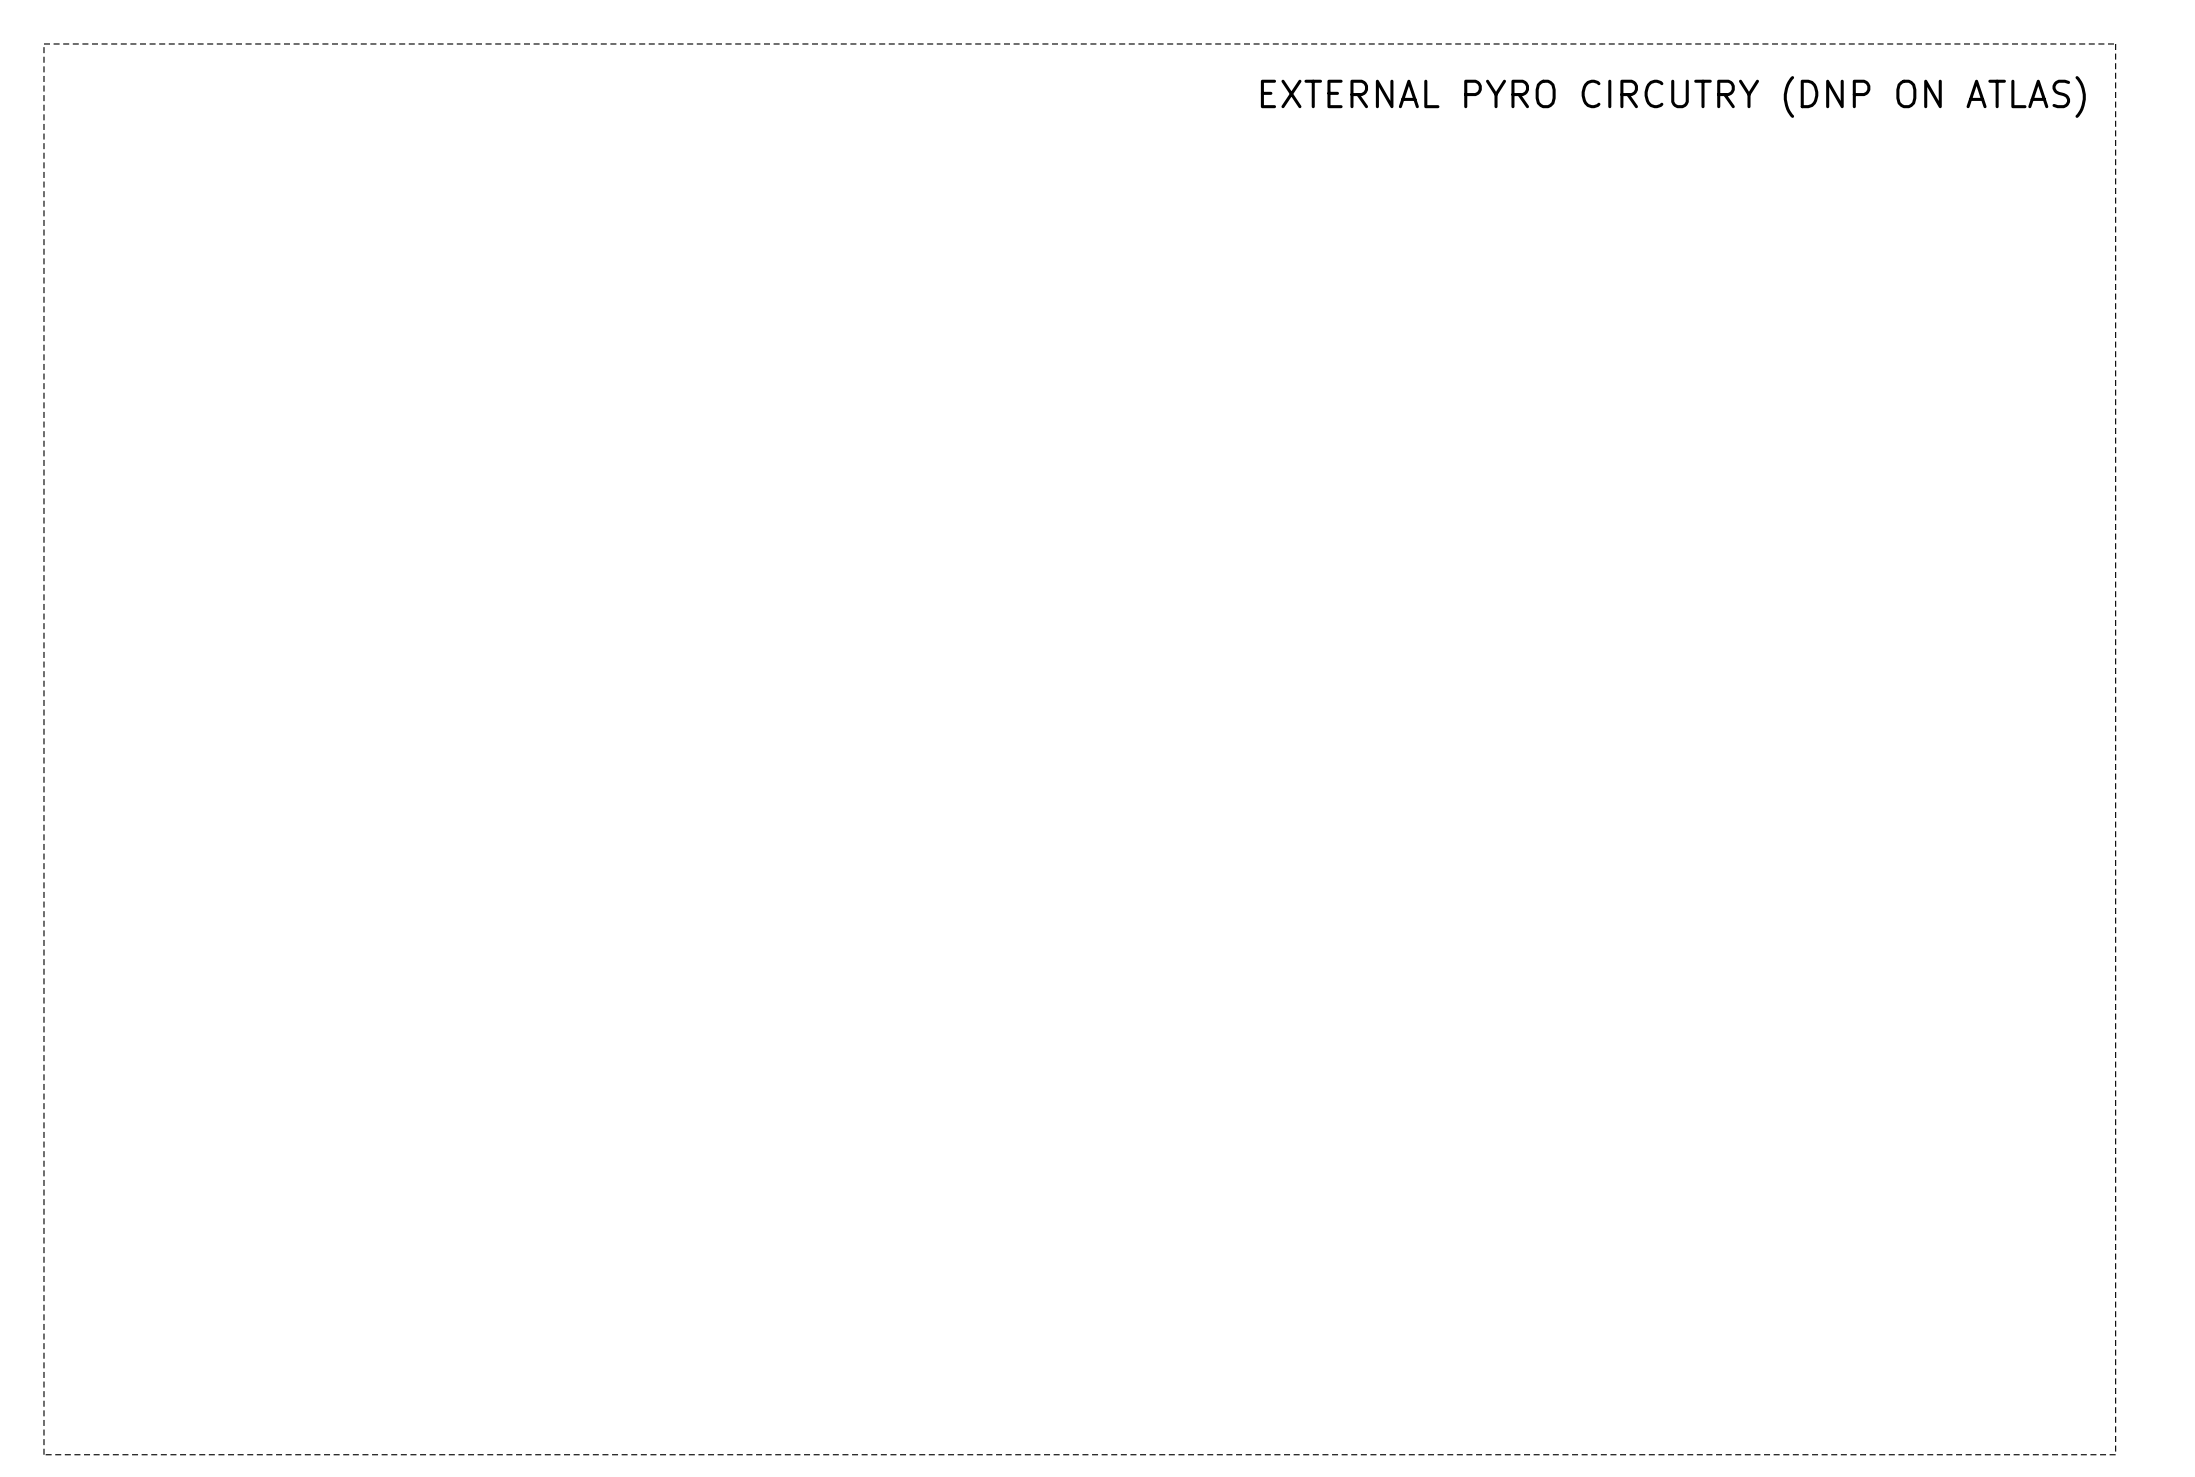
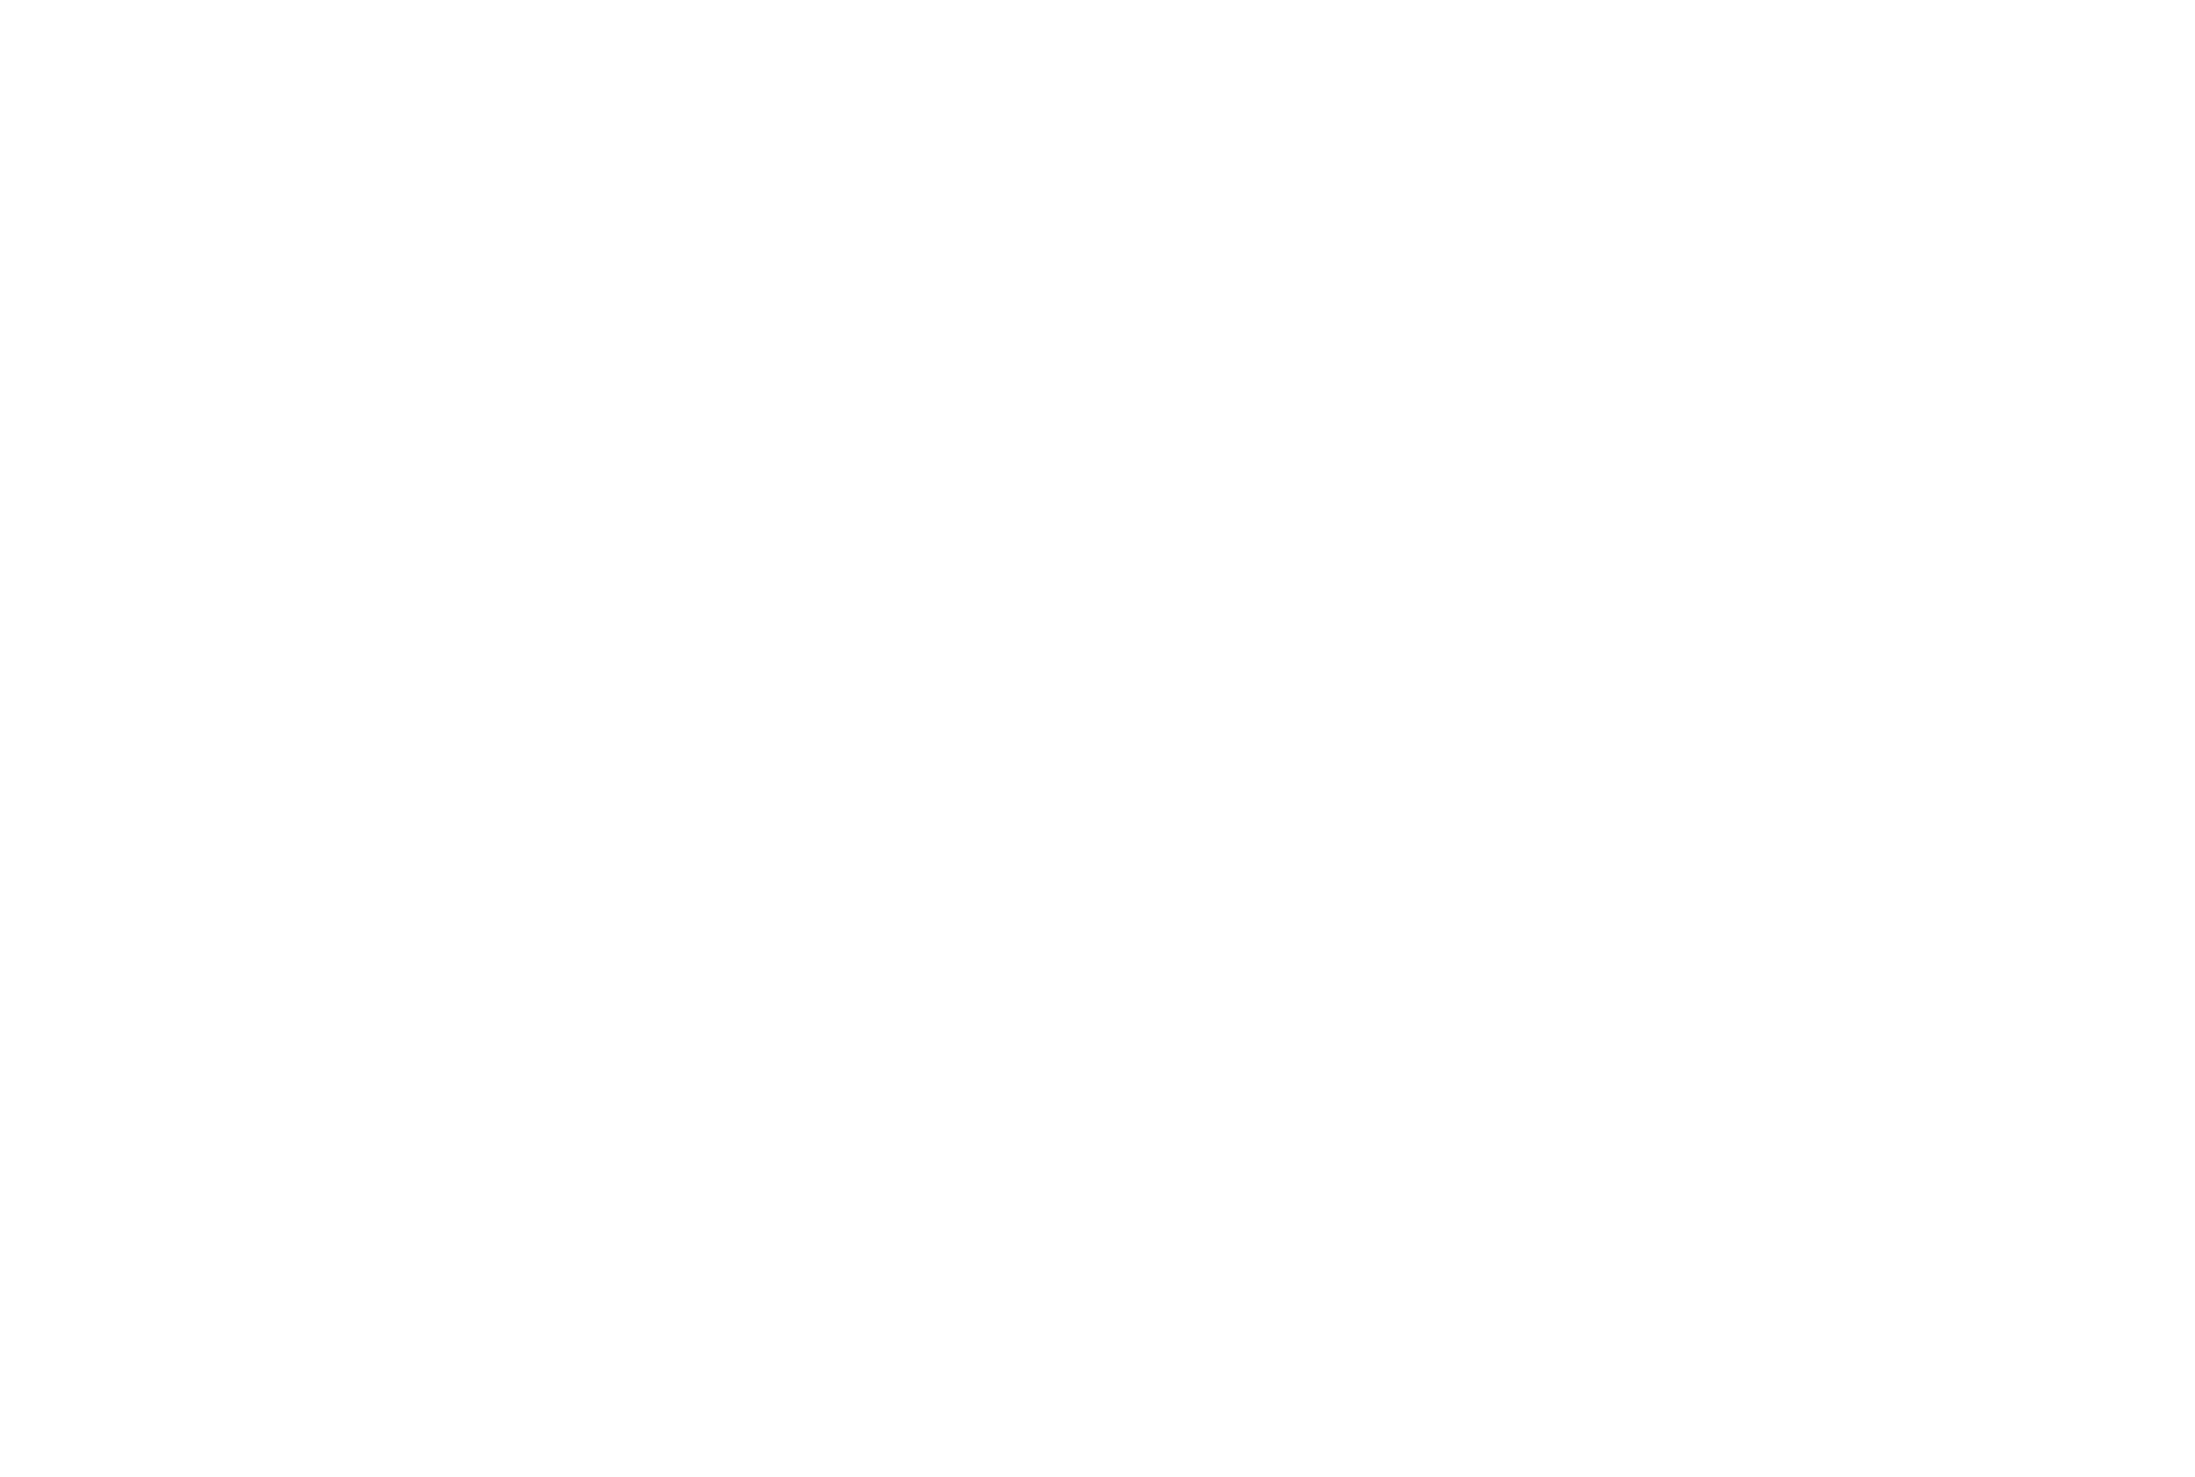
line: (43, 43) (2115, 43) (2115, 1454) (43, 1454) (43, 43) -> none
text: EXTERNAL PYRO CIRCUTRY (DNP ON ATLAS) (1673, 96) -> none

